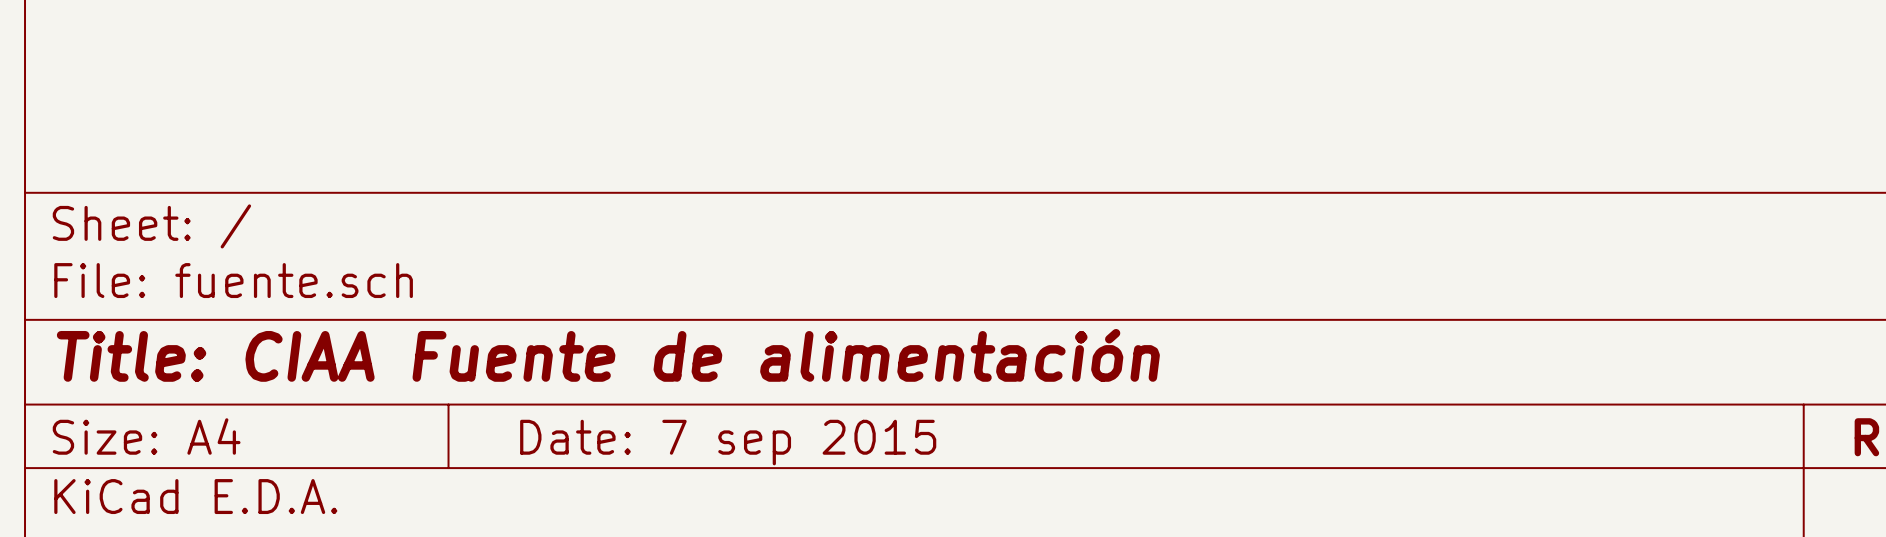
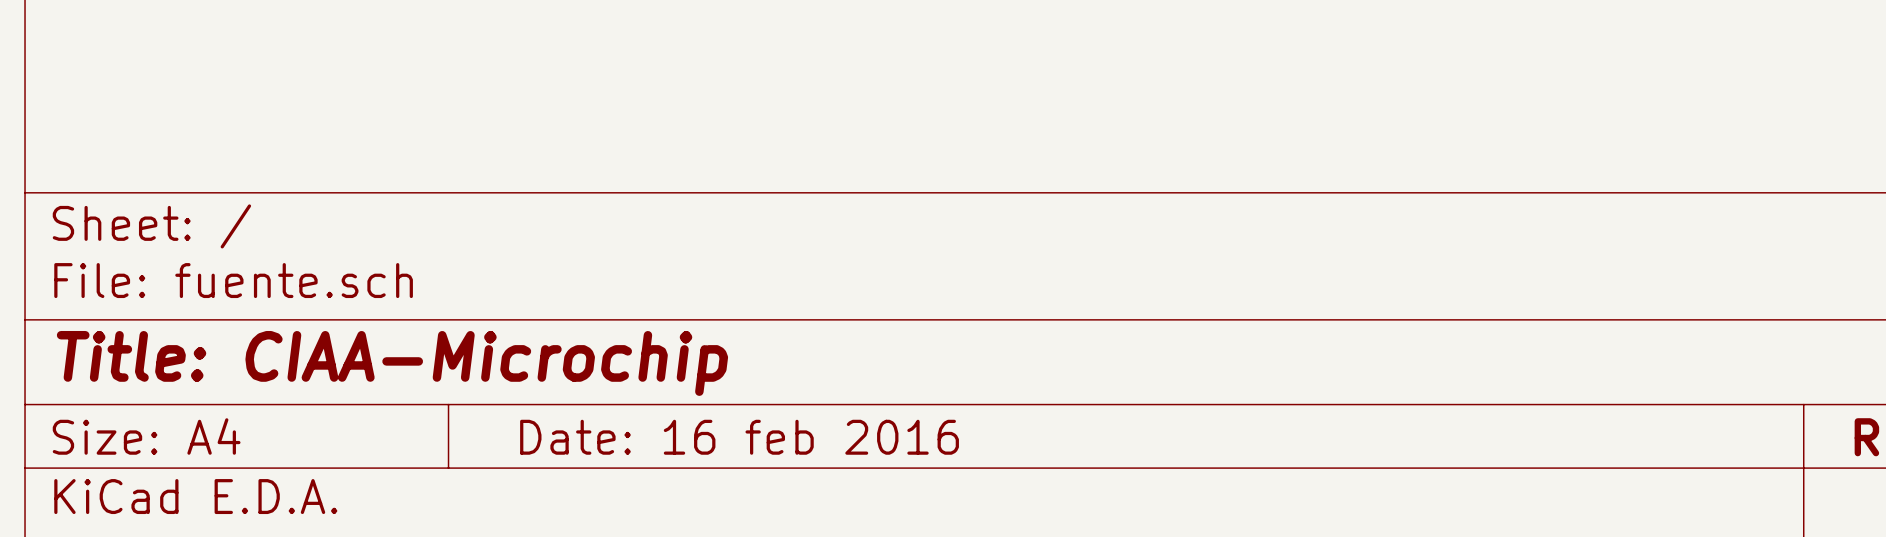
title block: Title: CIAA Fuente de alimentación (608, 355) -> Title: CIAA-Microchip (392, 363)
title block: Date: 7 sep 2015 (728, 442) -> Date: 16 feb 2016 (739, 437)

